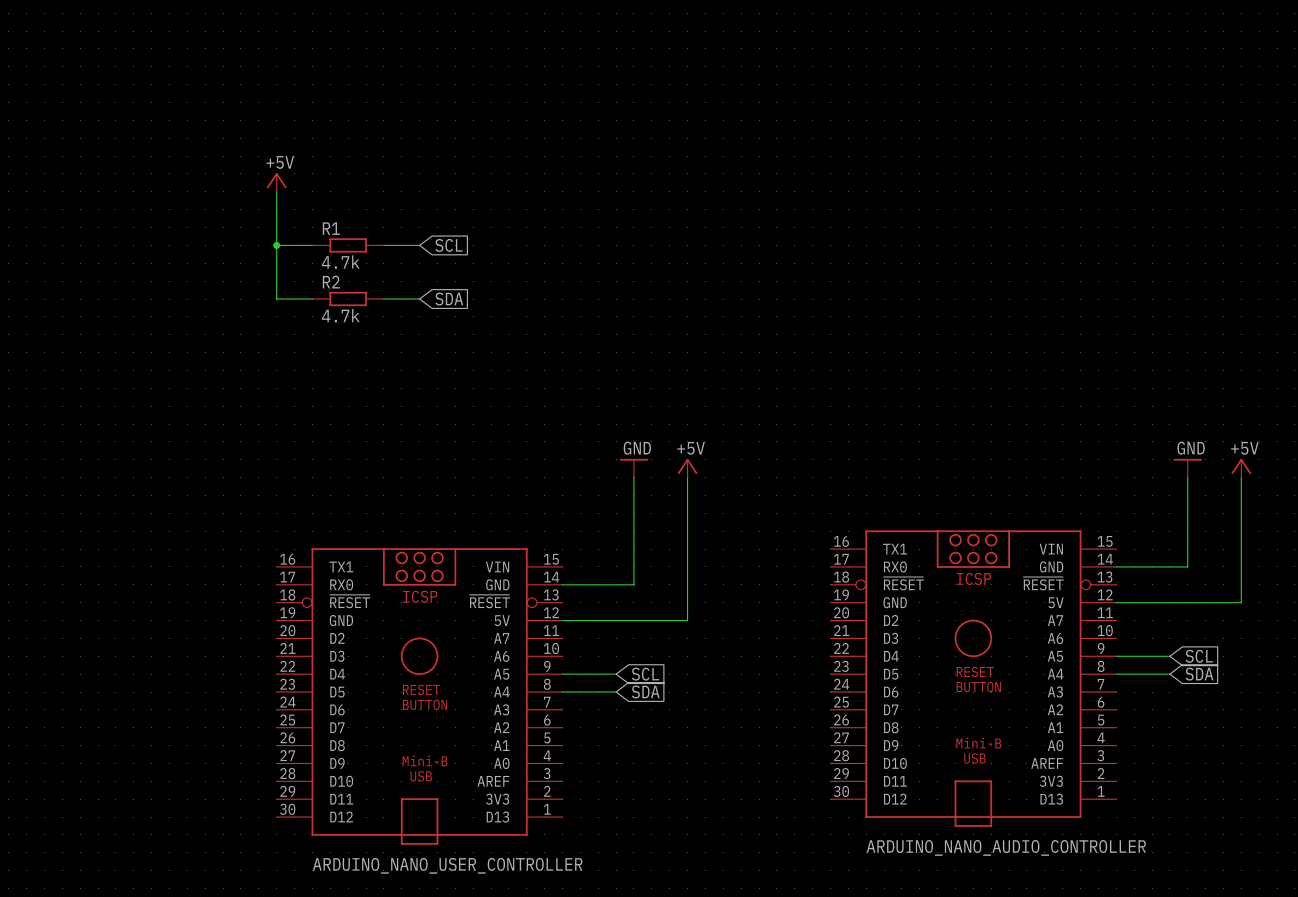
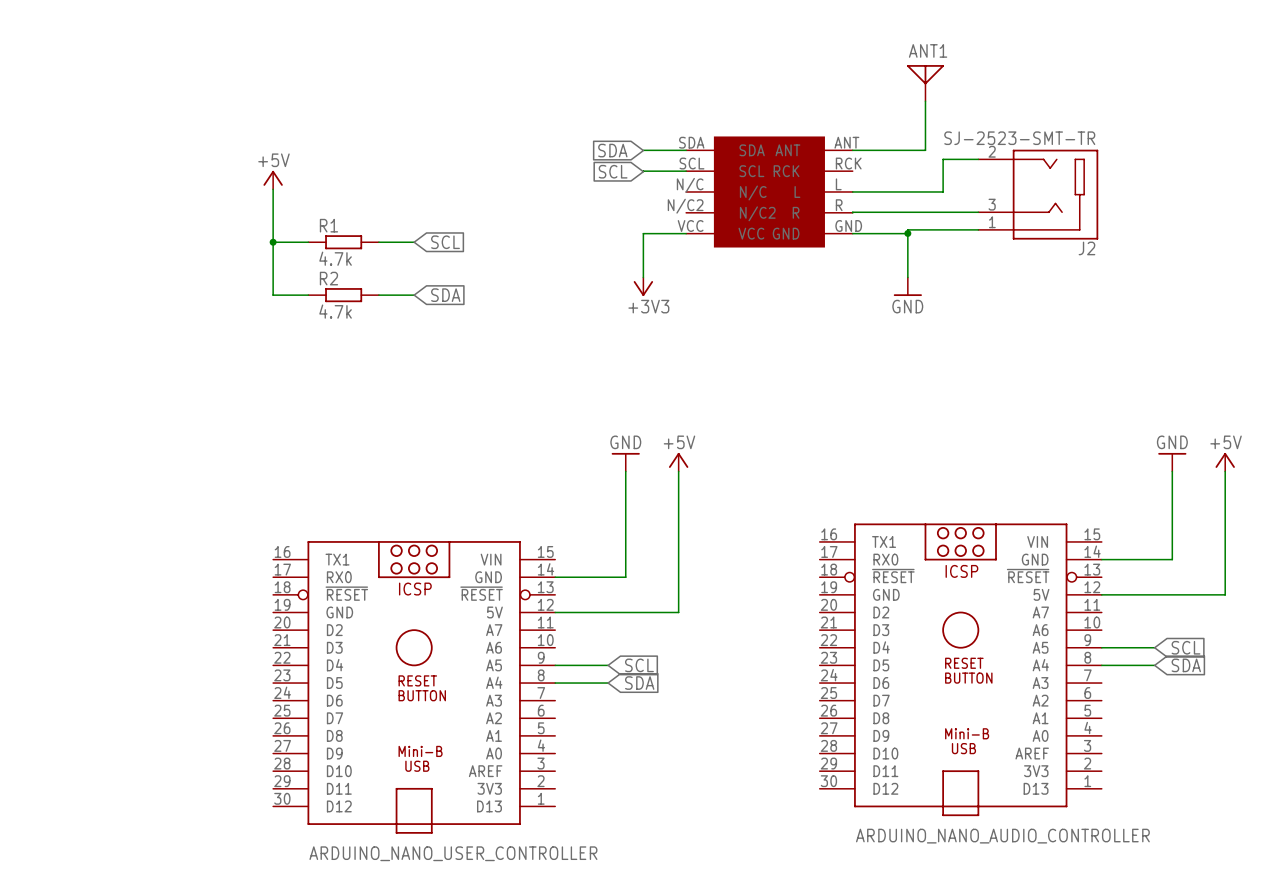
ANT1: none -> (925, 83)
wire: none -> (925, 101) (925, 150) (852, 150)
global label: none -> SDA (612, 150)
wire: none -> (643, 150) (686, 150)
wire: none -> (978, 159) (943, 159) (943, 191) (852, 191)
global label: none -> SCL (613, 171)
wire: none -> (686, 171) (643, 171)
part: none -> (769, 191)
J2: none -> SJ-2523-SMT-TR (1038, 194)
wire: none -> (978, 212) (852, 212)
wire: none -> (978, 229) (907, 229) (907, 277)
wire: none -> (686, 233) (643, 233) (643, 277)
wire: none -> (852, 233) (907, 233)
junction: none -> (907, 233)
power symbol: none -> +3V3 (643, 286)
power symbol: none -> GND (907, 286)

